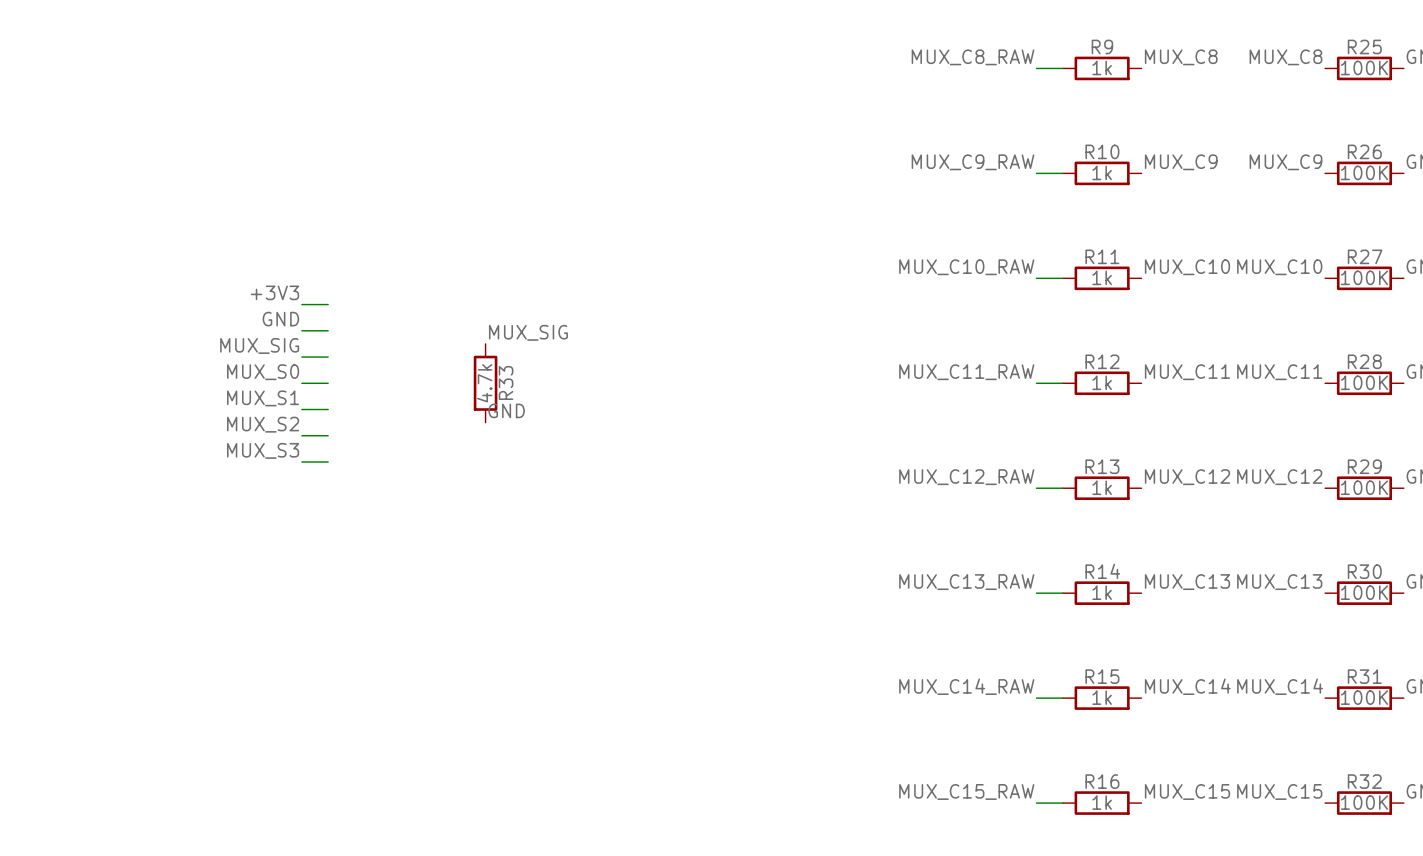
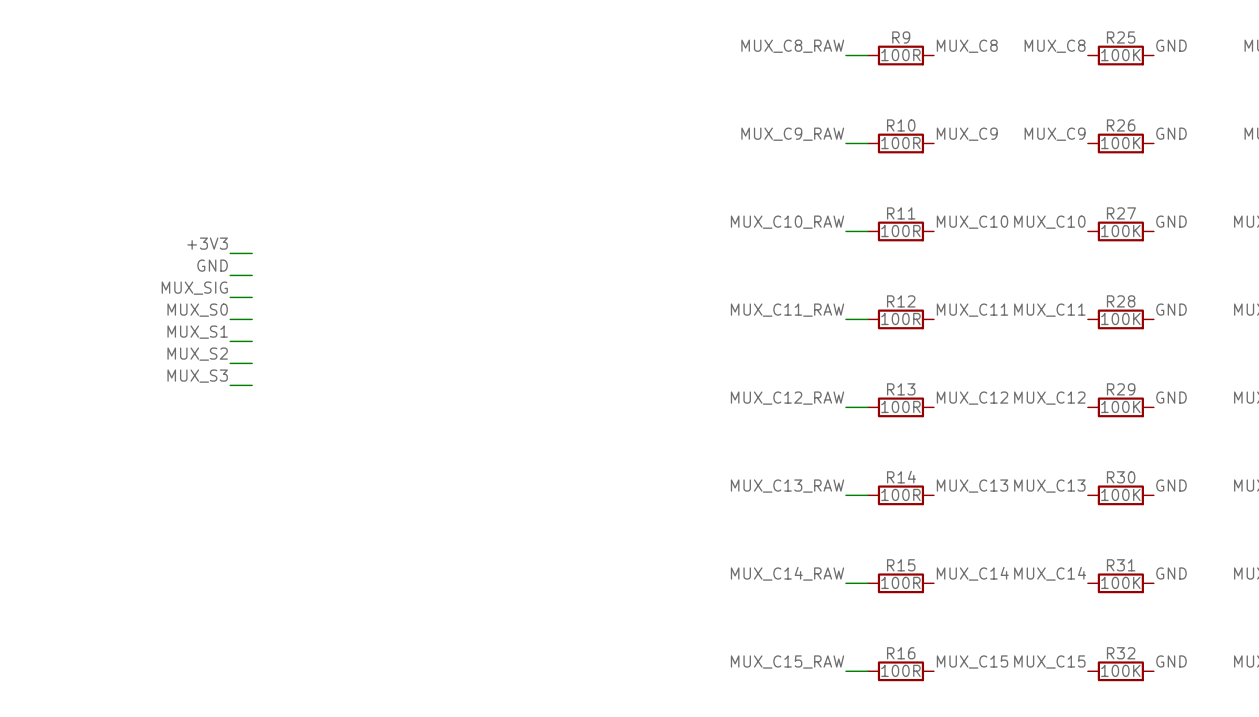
R9 value: 1k (1102, 67) -> 100R (900, 55)
R10 value: 1k (1102, 172) -> 100R (900, 143)
R11 value: 1k (1102, 277) -> 100R (900, 231)
label: MUX_SIG (528, 332) -> none
R12 value: 1k (1102, 382) -> 100R (900, 319)
R33: 4.7k (485, 383) -> none
label: GND (506, 410) -> none
R13 value: 1k (1102, 487) -> 100R (900, 406)
R14 value: 1k (1102, 592) -> 100R (900, 494)
R15 value: 1k (1102, 697) -> 100R (900, 582)
R16 value: 1k (1102, 802) -> 100R (900, 670)

